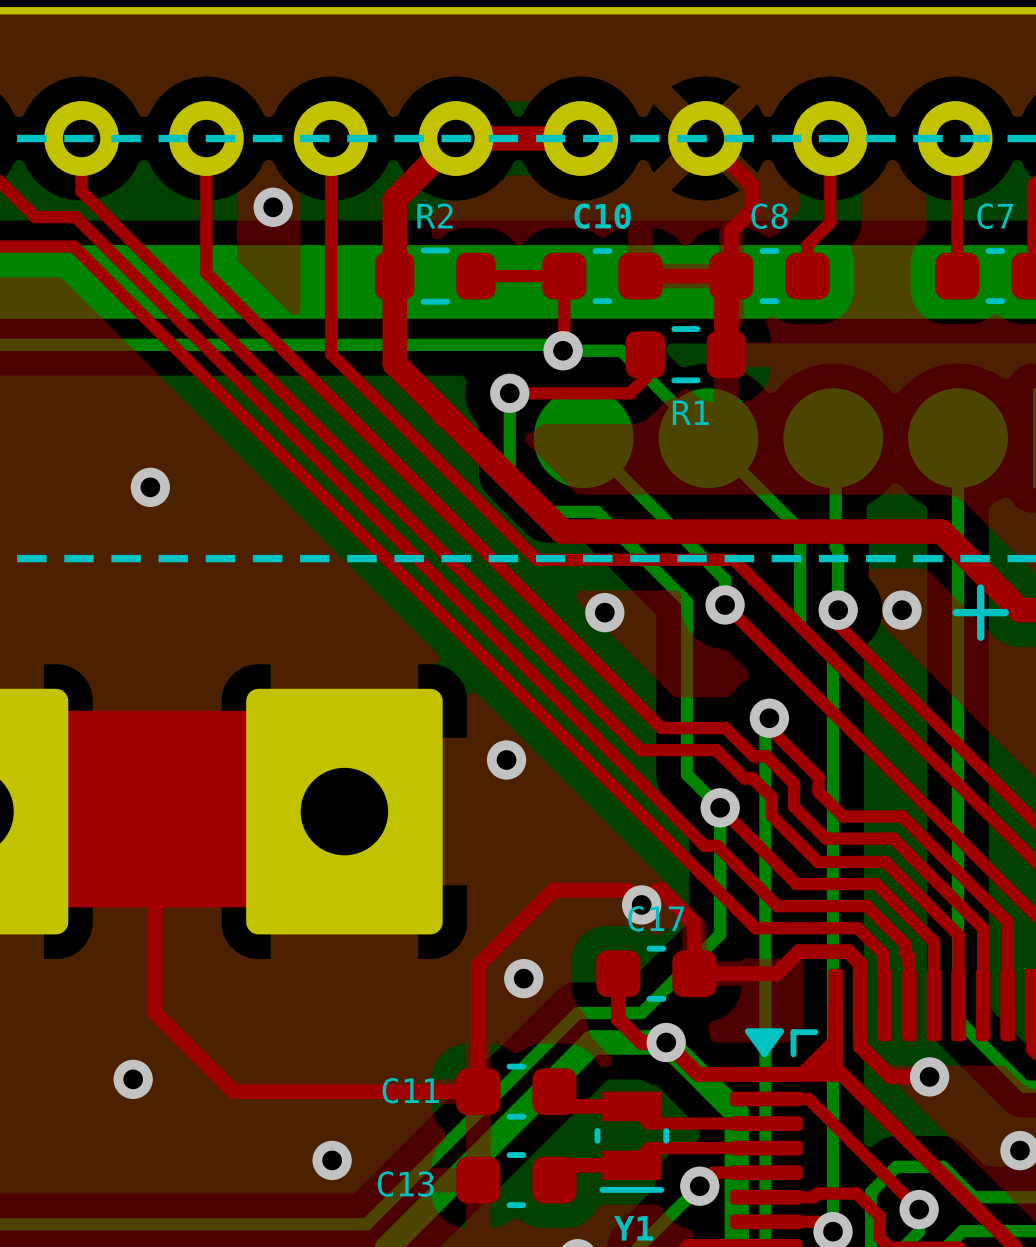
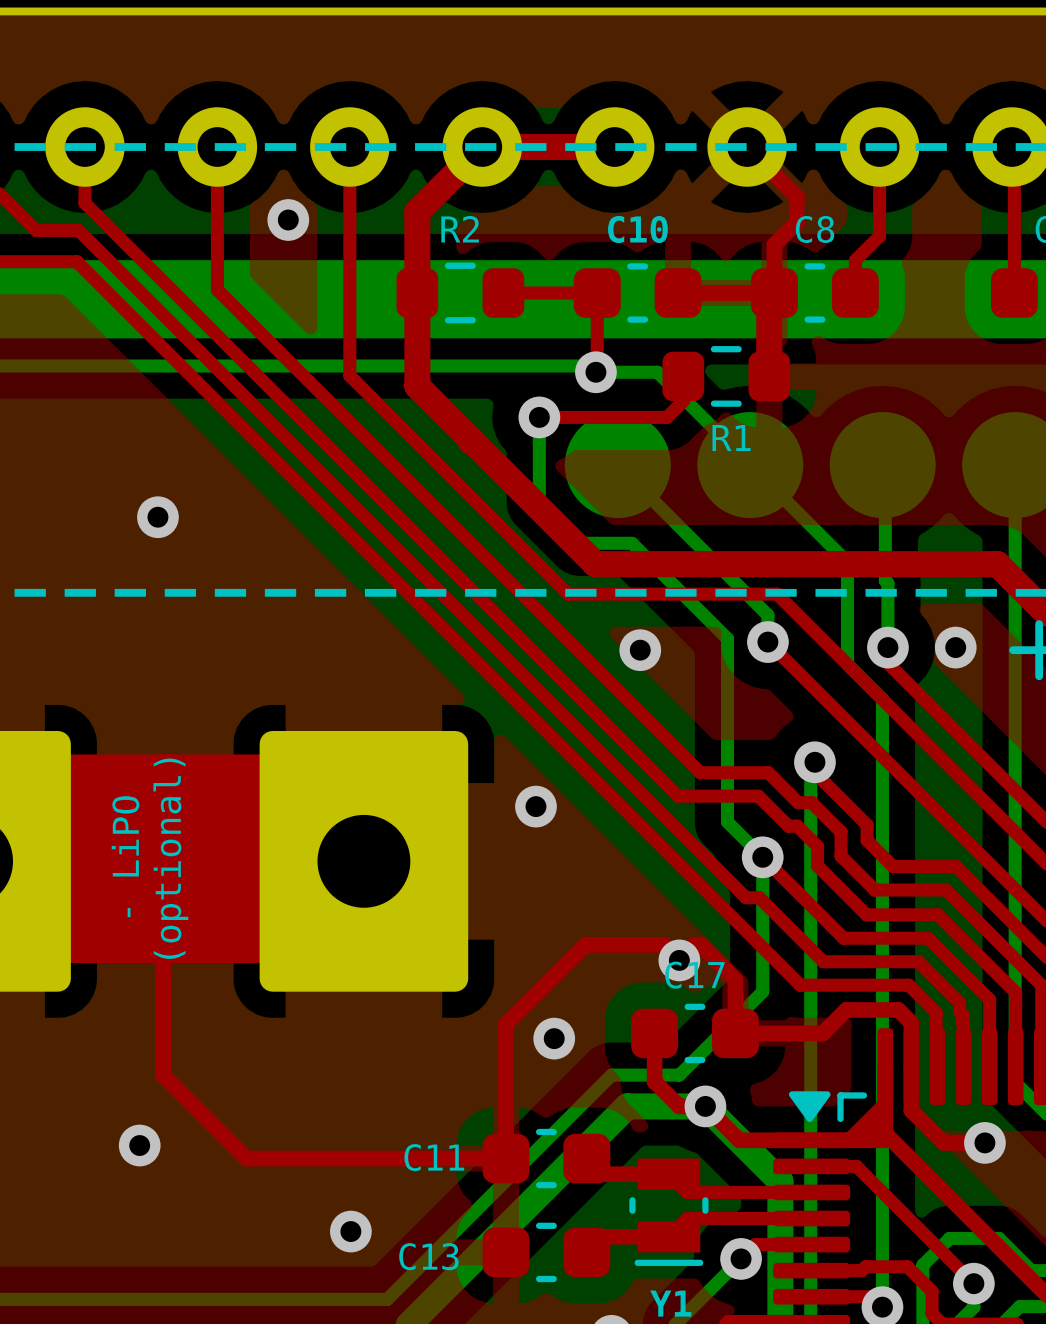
text: none -> - LiPO (125, 856)
text: none -> (optional) (170, 858)

